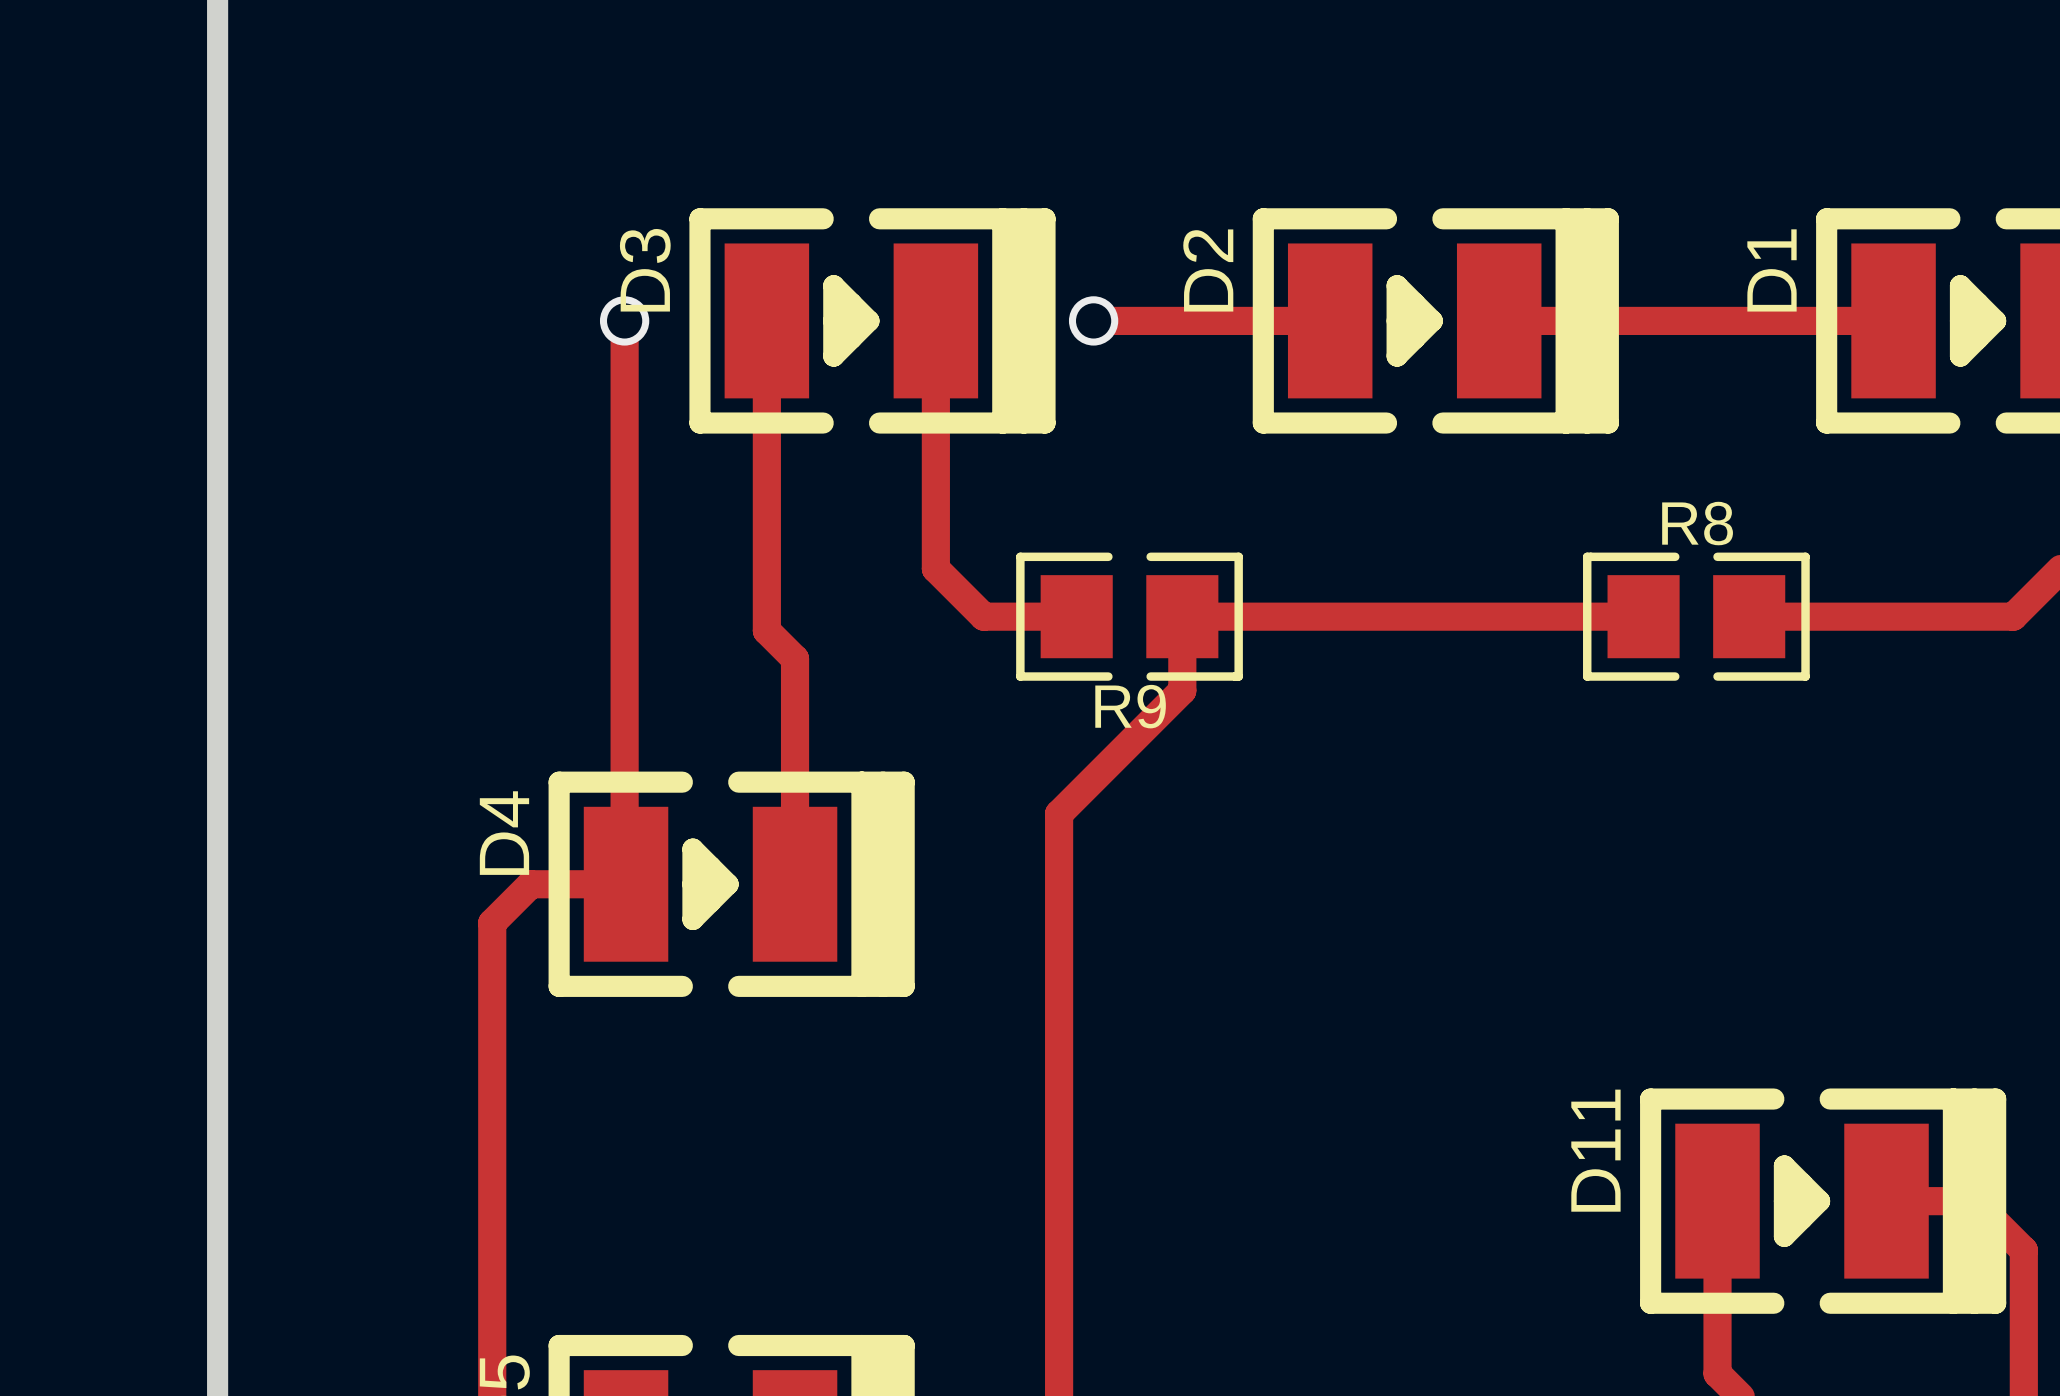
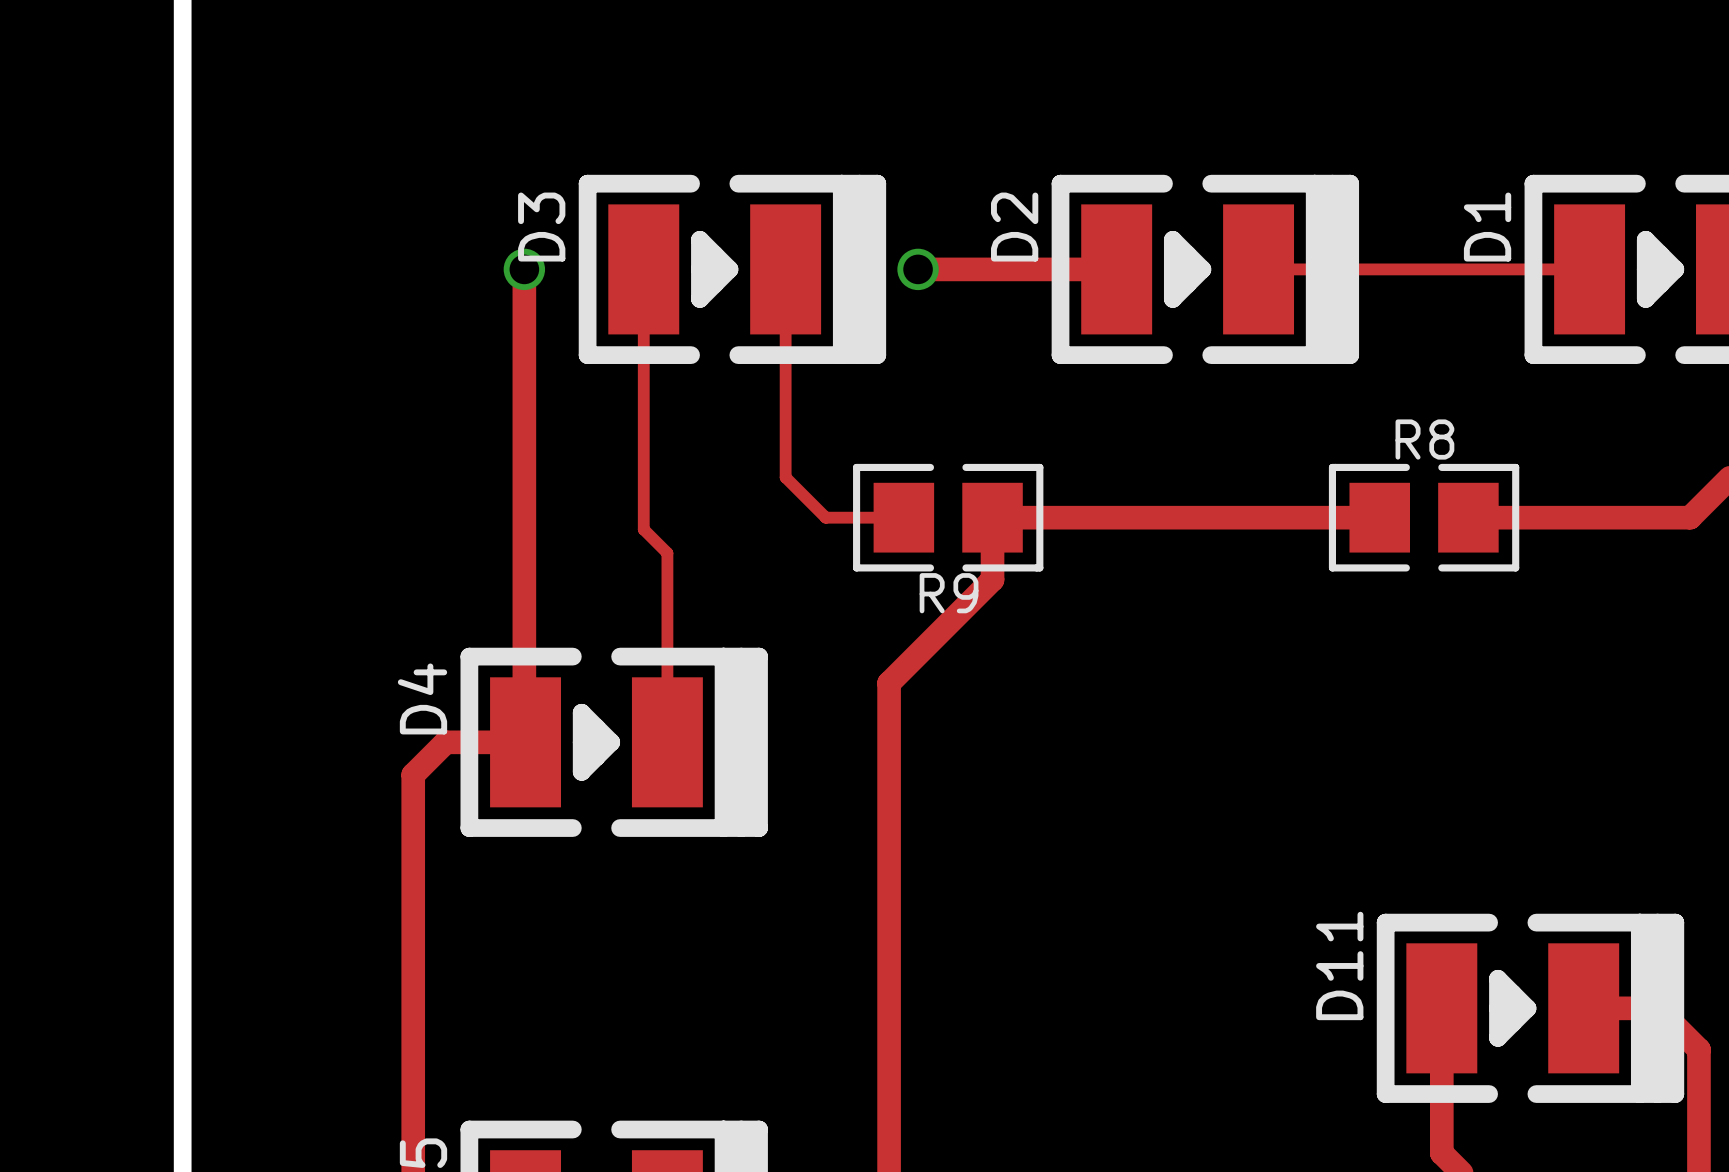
track width: thick (766, 320) (766, 630) (795, 658) (795, 884) -> thin (643, 269) (643, 529) (667, 553) (667, 742)
track width: thick (935, 320) (935, 568) (983, 616) (1076, 616) -> thin (785, 269) (785, 477) (825, 517) (903, 517)
track width: thick (1499, 320) (1893, 320) -> thin (1258, 269) (1589, 269)

